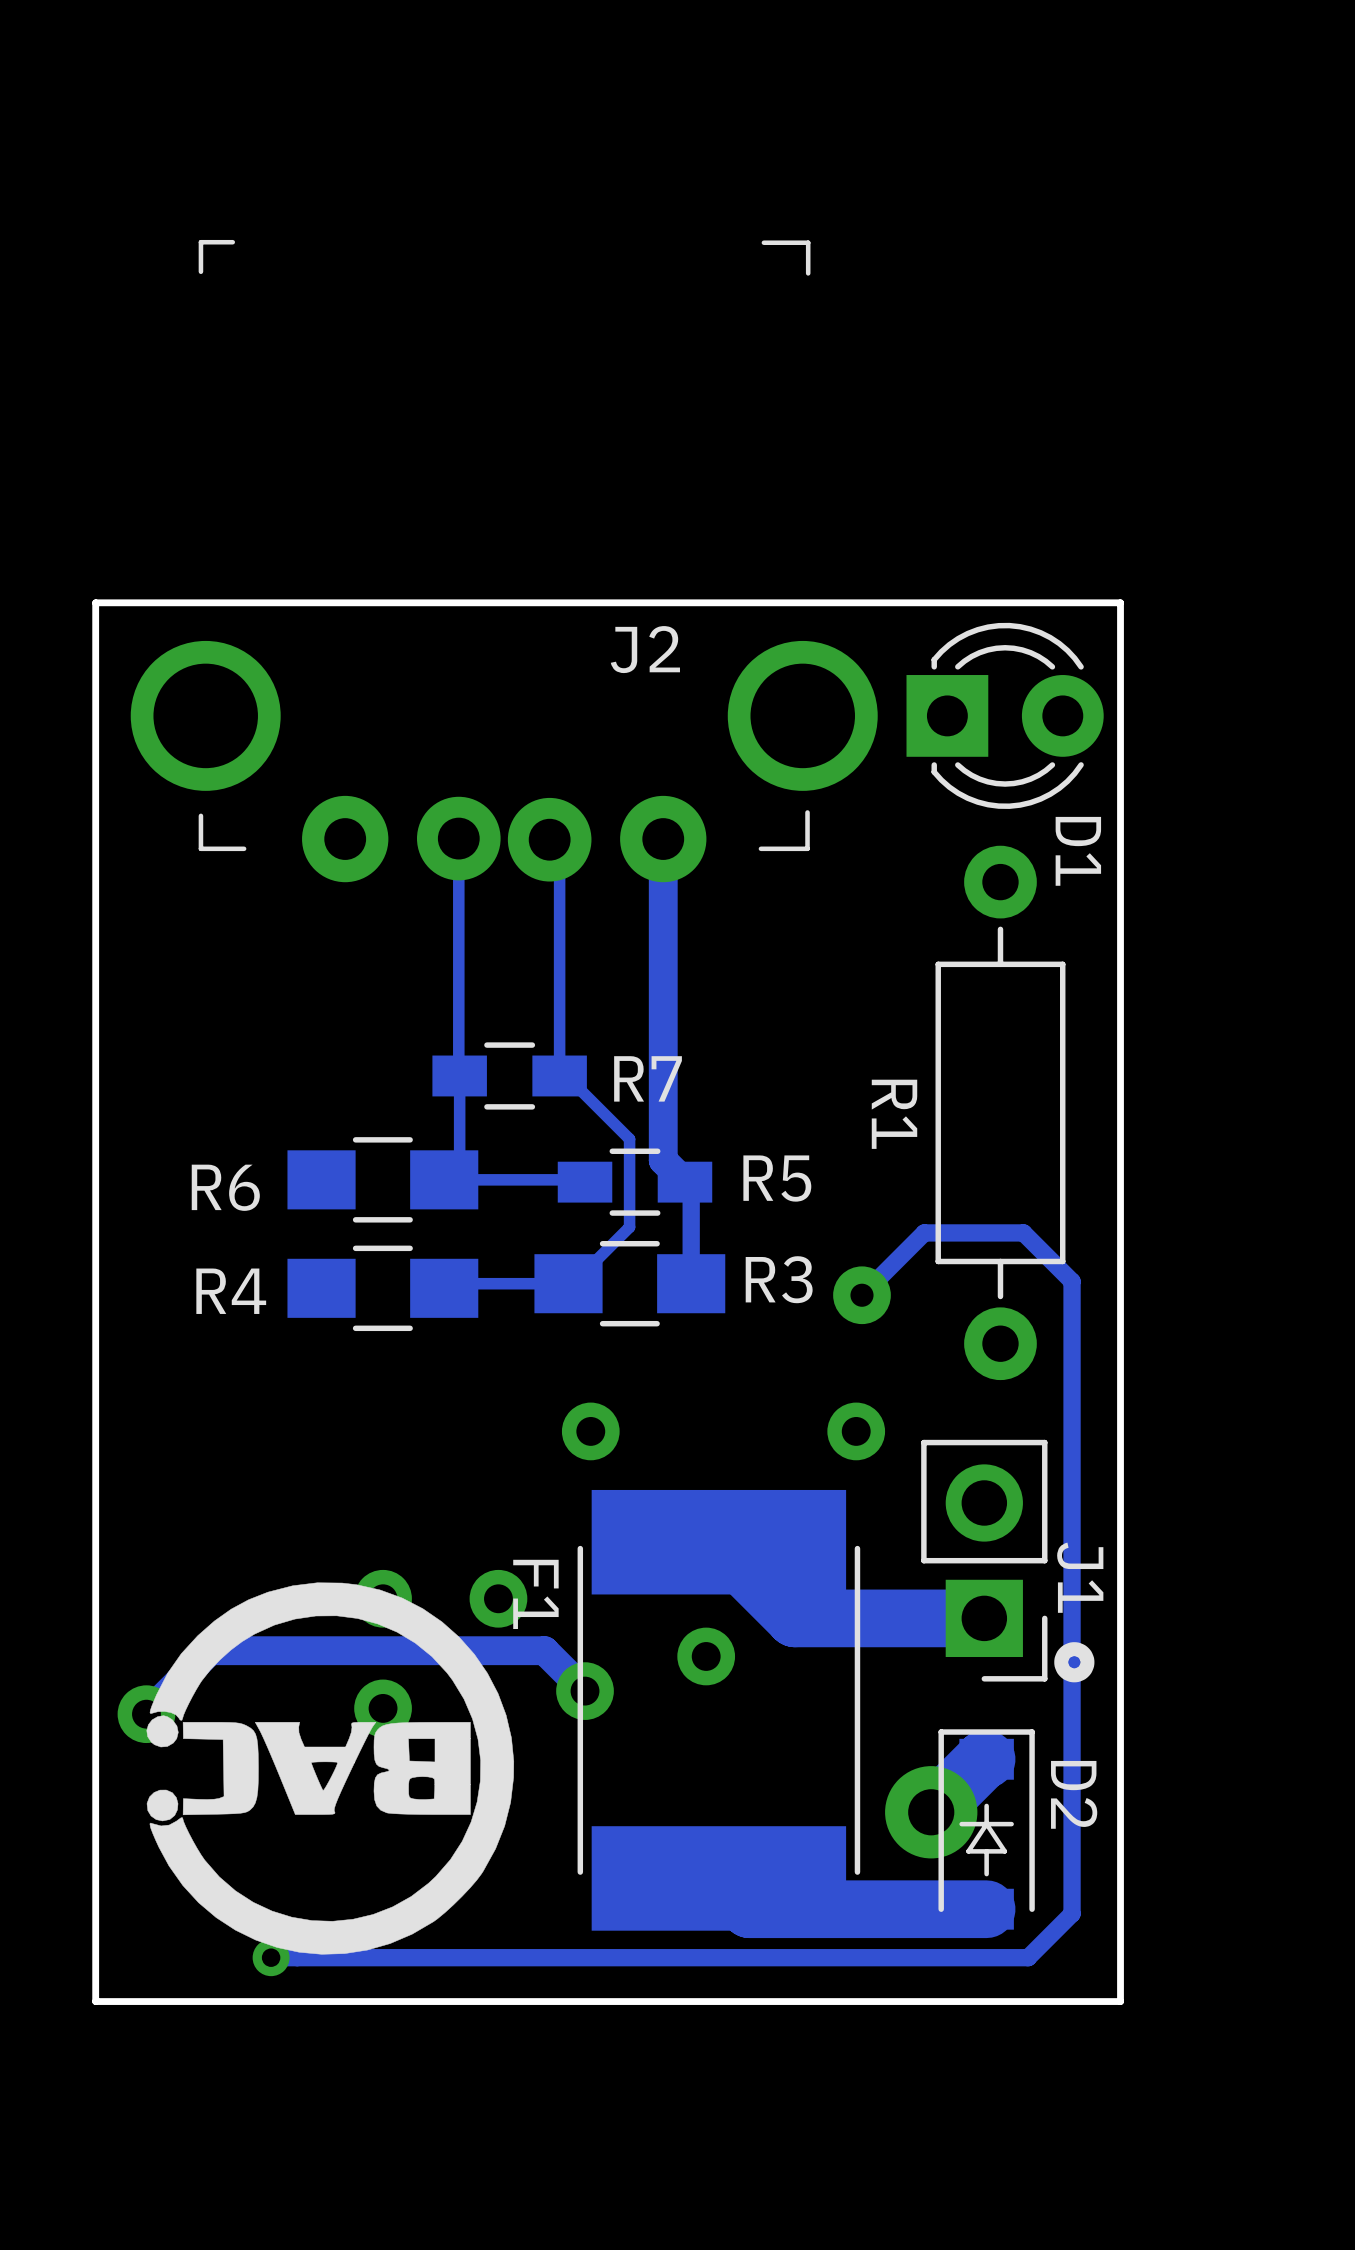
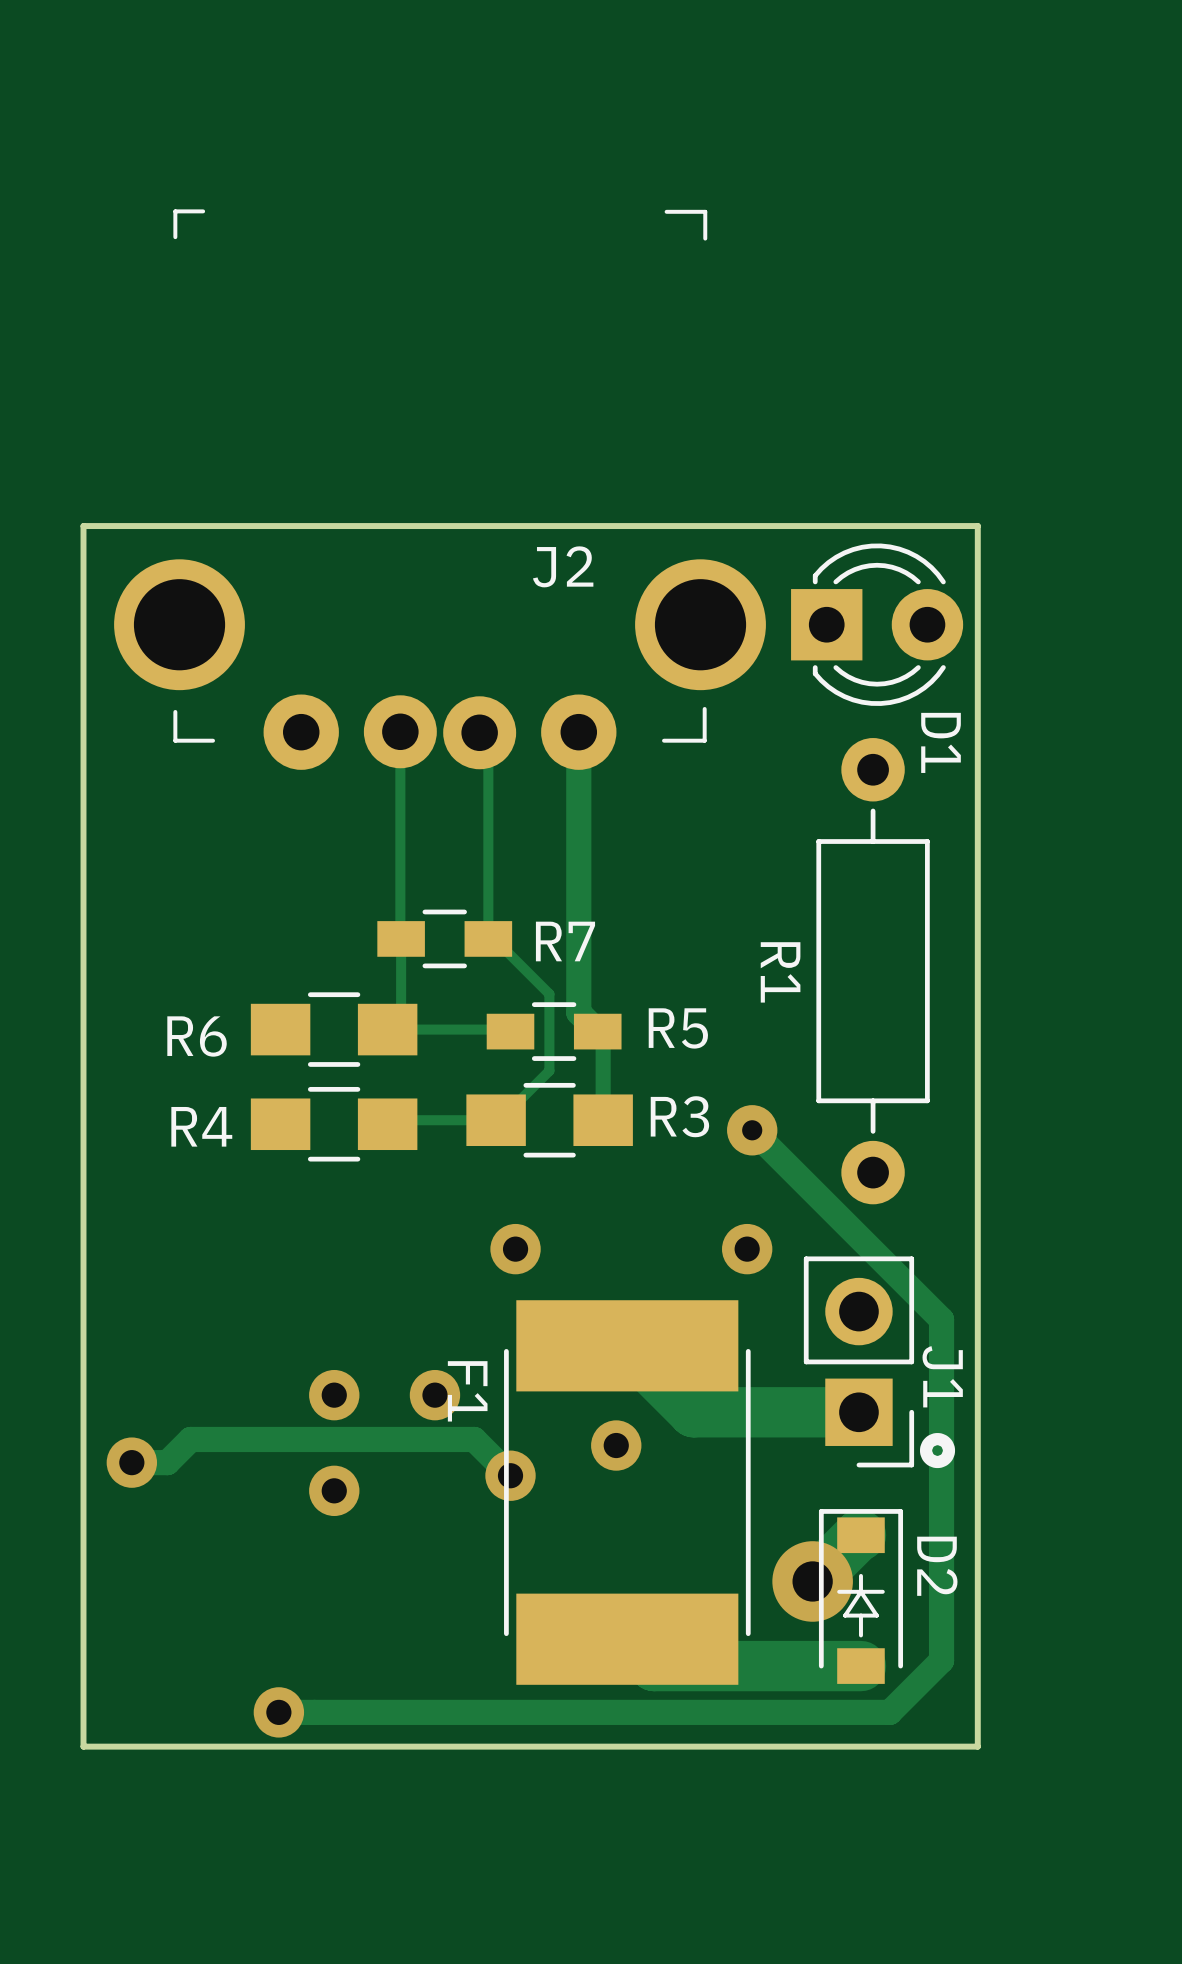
track: (861, 1295) (924, 1232) (1023, 1232) (1072, 1281) (1072, 1913) (1028, 1957) (271, 1957) -> (752, 1130) (941, 1319) (941, 1660) (889, 1712) (278, 1712)
drawing: [146, 1582, 515, 1955] -> none
track: (544, 1650) (209, 1650) (146, 1714) -> (475, 1440) (190, 1439) (167, 1462) (131, 1462)
via position: (146, 1714) -> (131, 1462)
via: (271, 1957) -> none
via: none -> (278, 1712)

